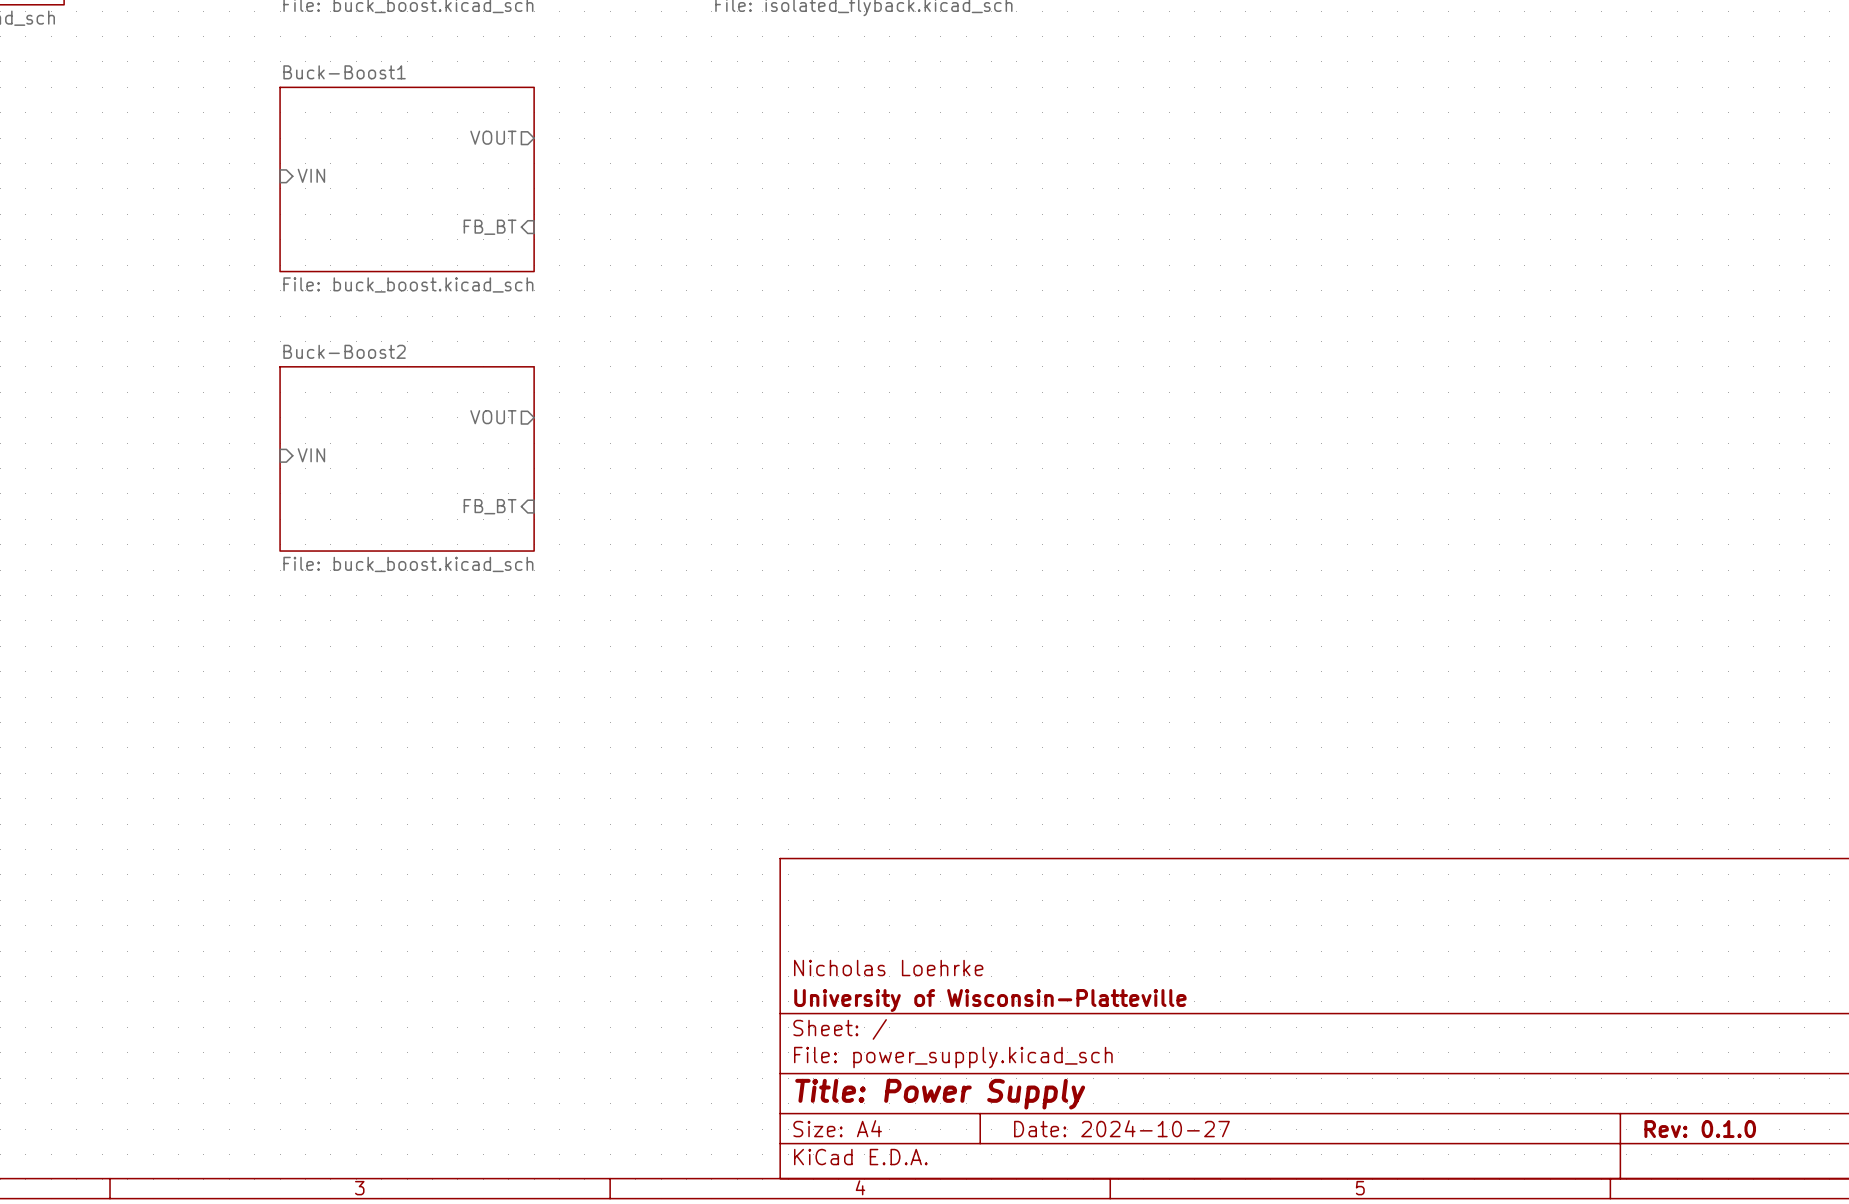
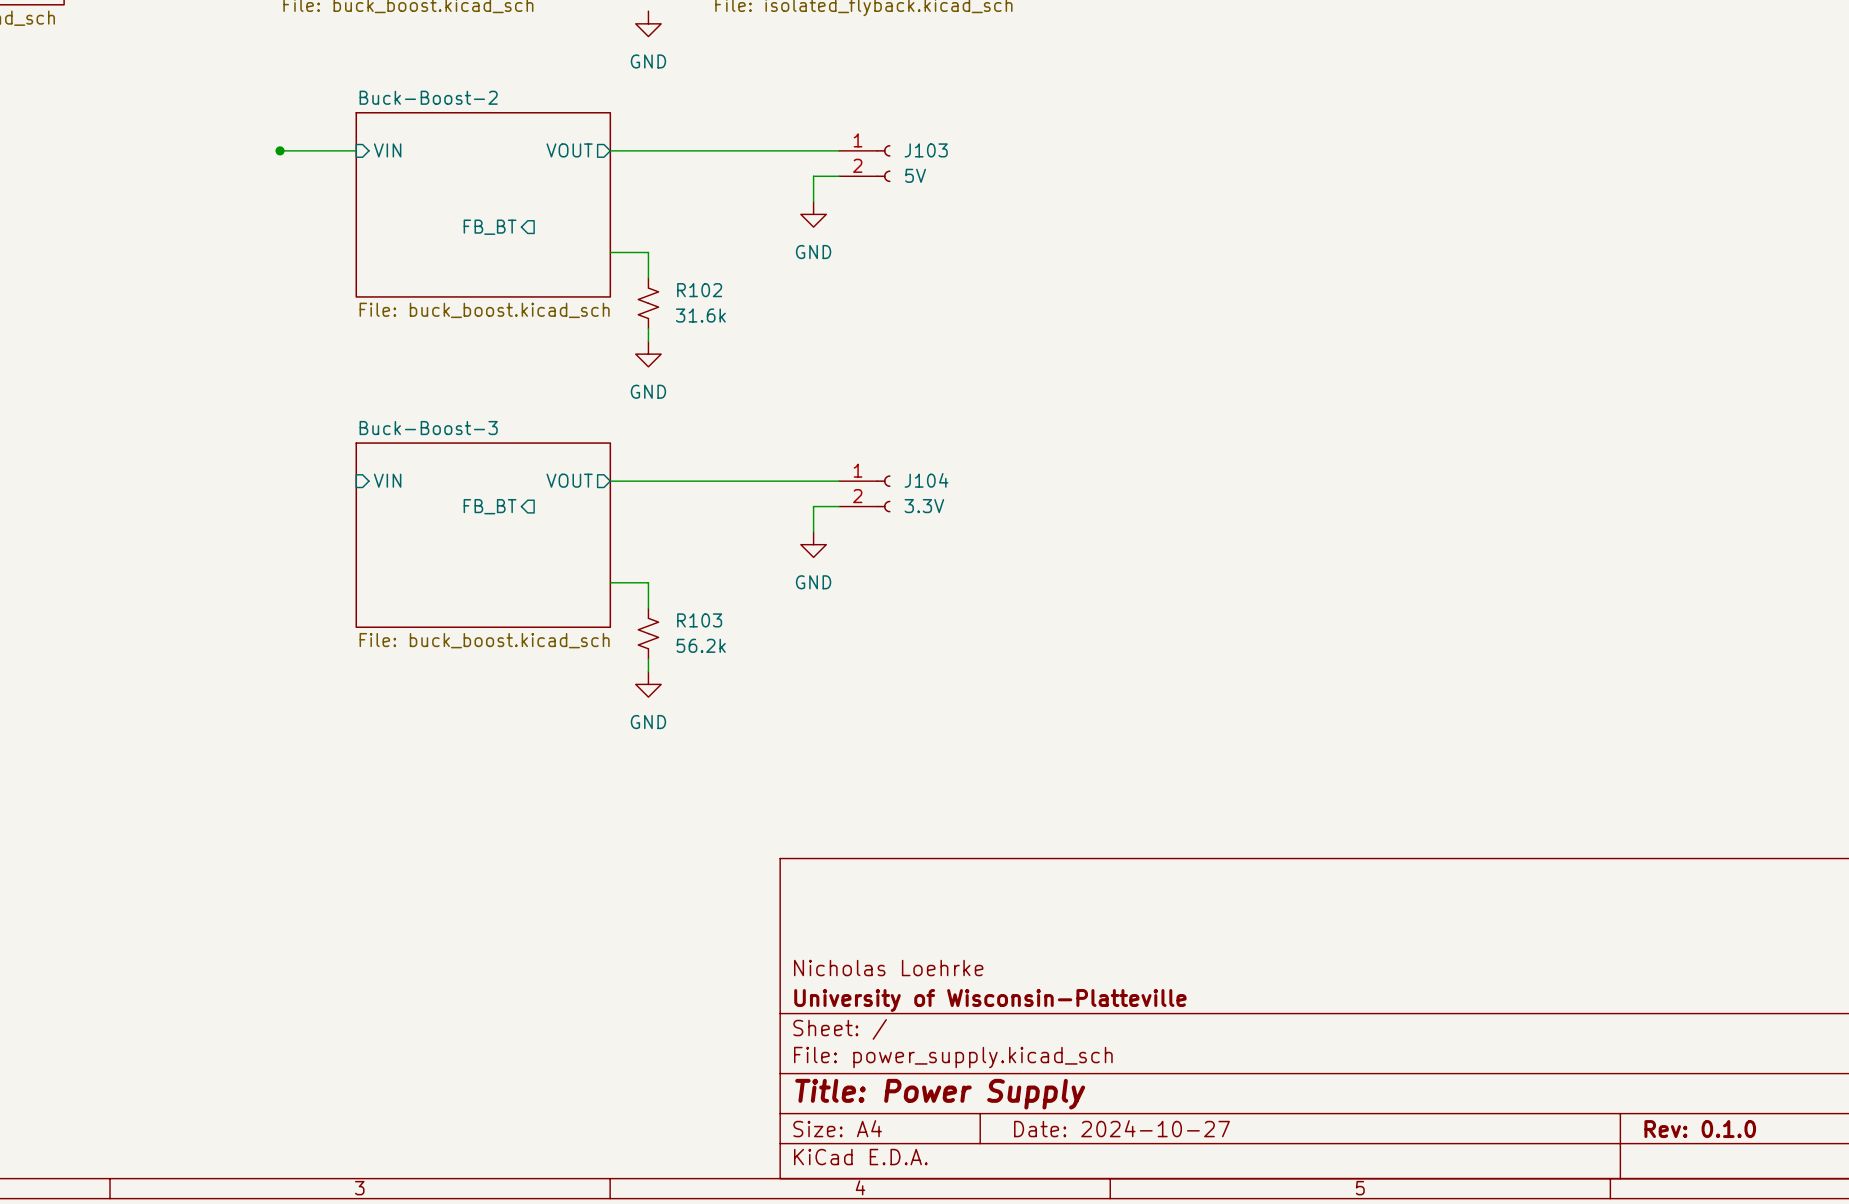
power symbol: none -> GND (648, 23)
sheet pin position: VOUT (493, 137) -> VOUT (569, 150)
wire: none -> (280, 150) (356, 150)
junction: none -> (280, 150)
wire: none -> (610, 150) (838, 150)
J103: none -> 5V (864, 163)
sheet pin position: VIN (311, 175) -> VIN (387, 150)
wire: none -> (838, 176) (813, 176) (813, 201)
sheet Buck-Boost1: File: buck_boost.kicad_sch (407, 179) -> none
sheet Buck-Boost-2: none -> File: buck_boost.kicad_sch (483, 204)
power symbol: none -> GND (813, 214)
wire: none -> (610, 252) (648, 252) (648, 277)
R102: none -> 31.6k (648, 303)
wire: none -> (648, 328) (648, 341)
power symbol: none -> GND (648, 354)
sheet pin position: VOUT (493, 417) -> VOUT (569, 480)
sheet pin position: VIN (311, 455) -> VIN (387, 480)
sheet Buck-Boost2: File: buck_boost.kicad_sch (407, 458) -> none
wire: none -> (610, 481) (838, 481)
J104: none -> 3.3V (864, 493)
wire: none -> (838, 506) (813, 506) (813, 531)
sheet Buck-Boost-3: none -> File: buck_boost.kicad_sch (483, 535)
power symbol: none -> GND (813, 544)
wire: none -> (610, 582) (648, 582) (648, 608)
R103: none -> 56.2k (648, 633)
wire: none -> (648, 659) (648, 671)
power symbol: none -> GND (648, 684)

